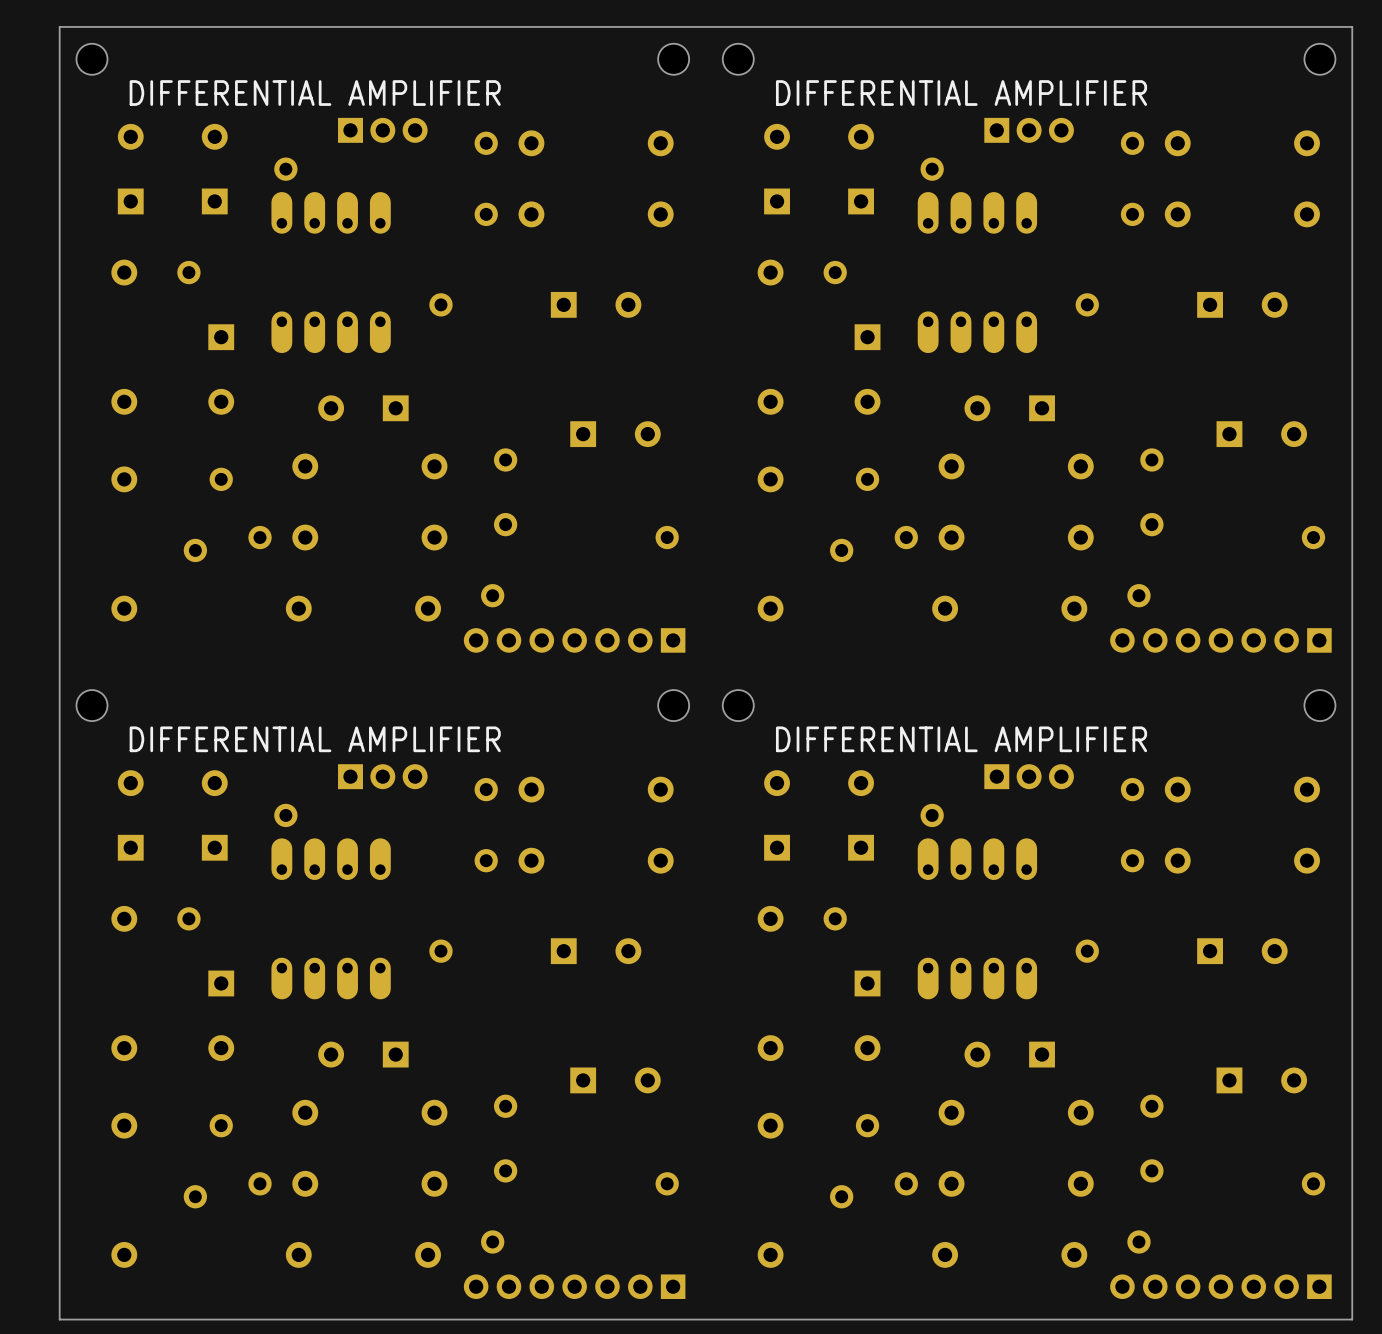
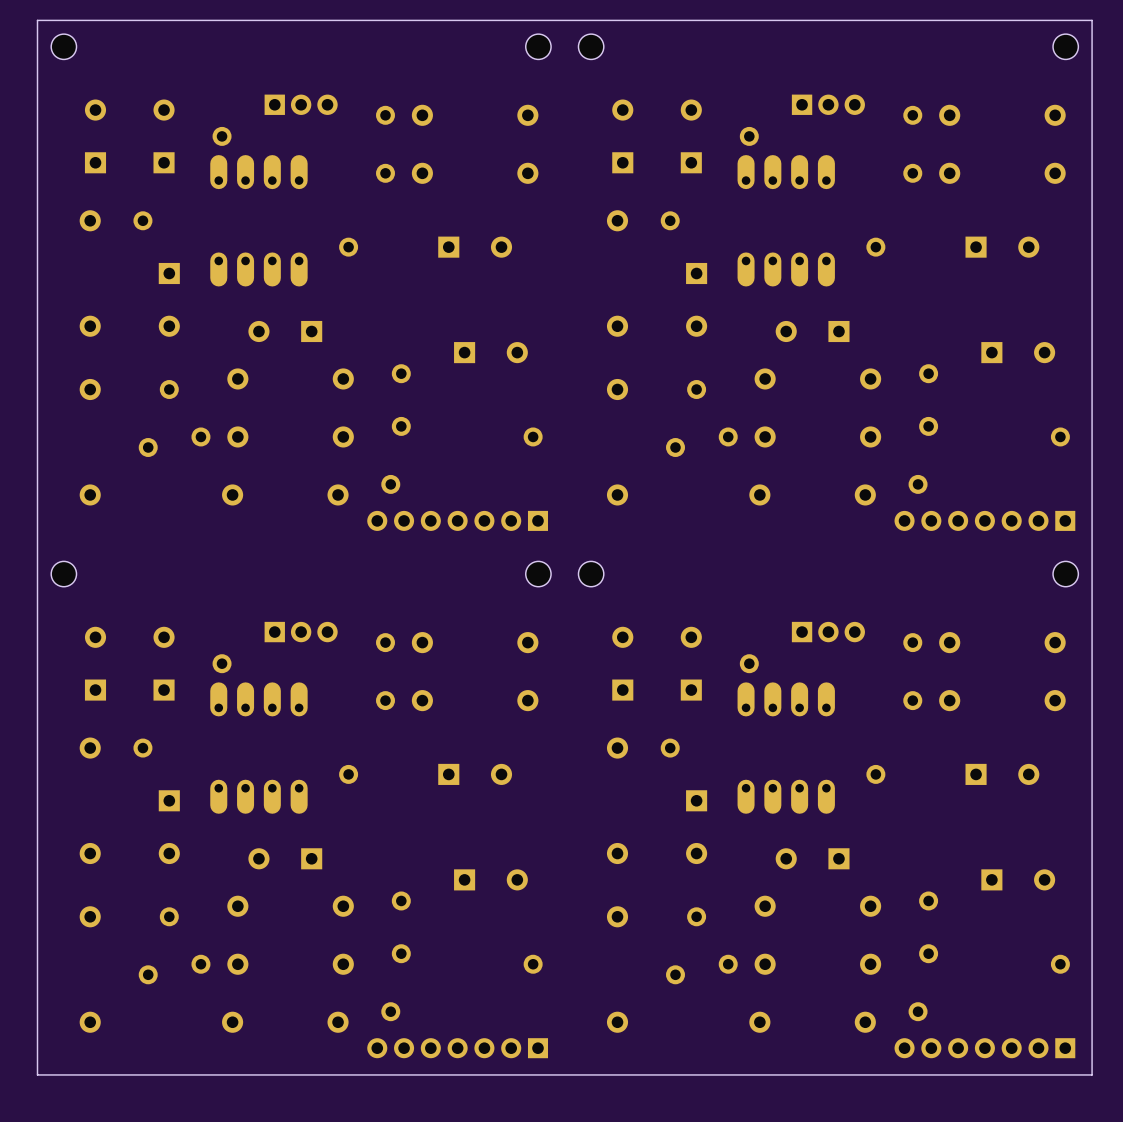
text: DIFFERENTIAL AMPLIFIER (315, 93) -> none
text: DIFFERENTIAL AMPLIFIER (961, 93) -> none
text: DIFFERENTIAL AMPLIFIER (315, 739) -> none
text: DIFFERENTIAL AMPLIFIER (961, 739) -> none

